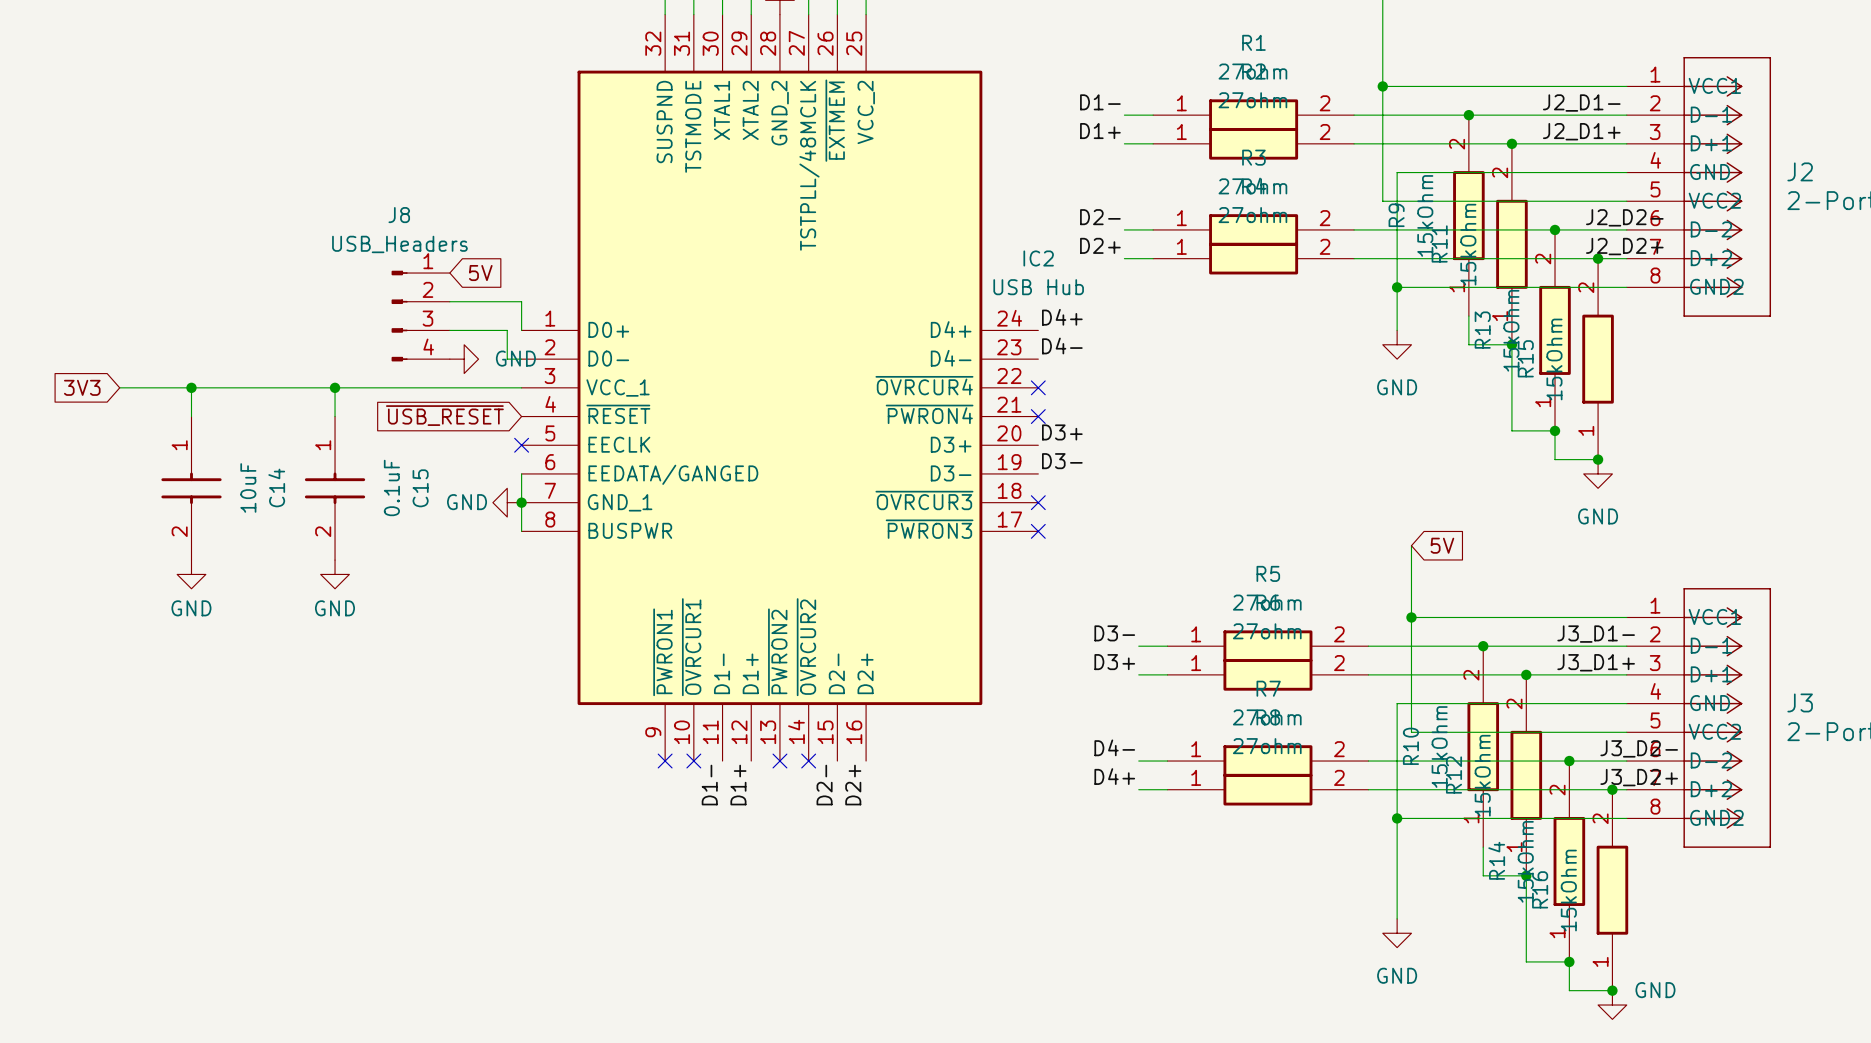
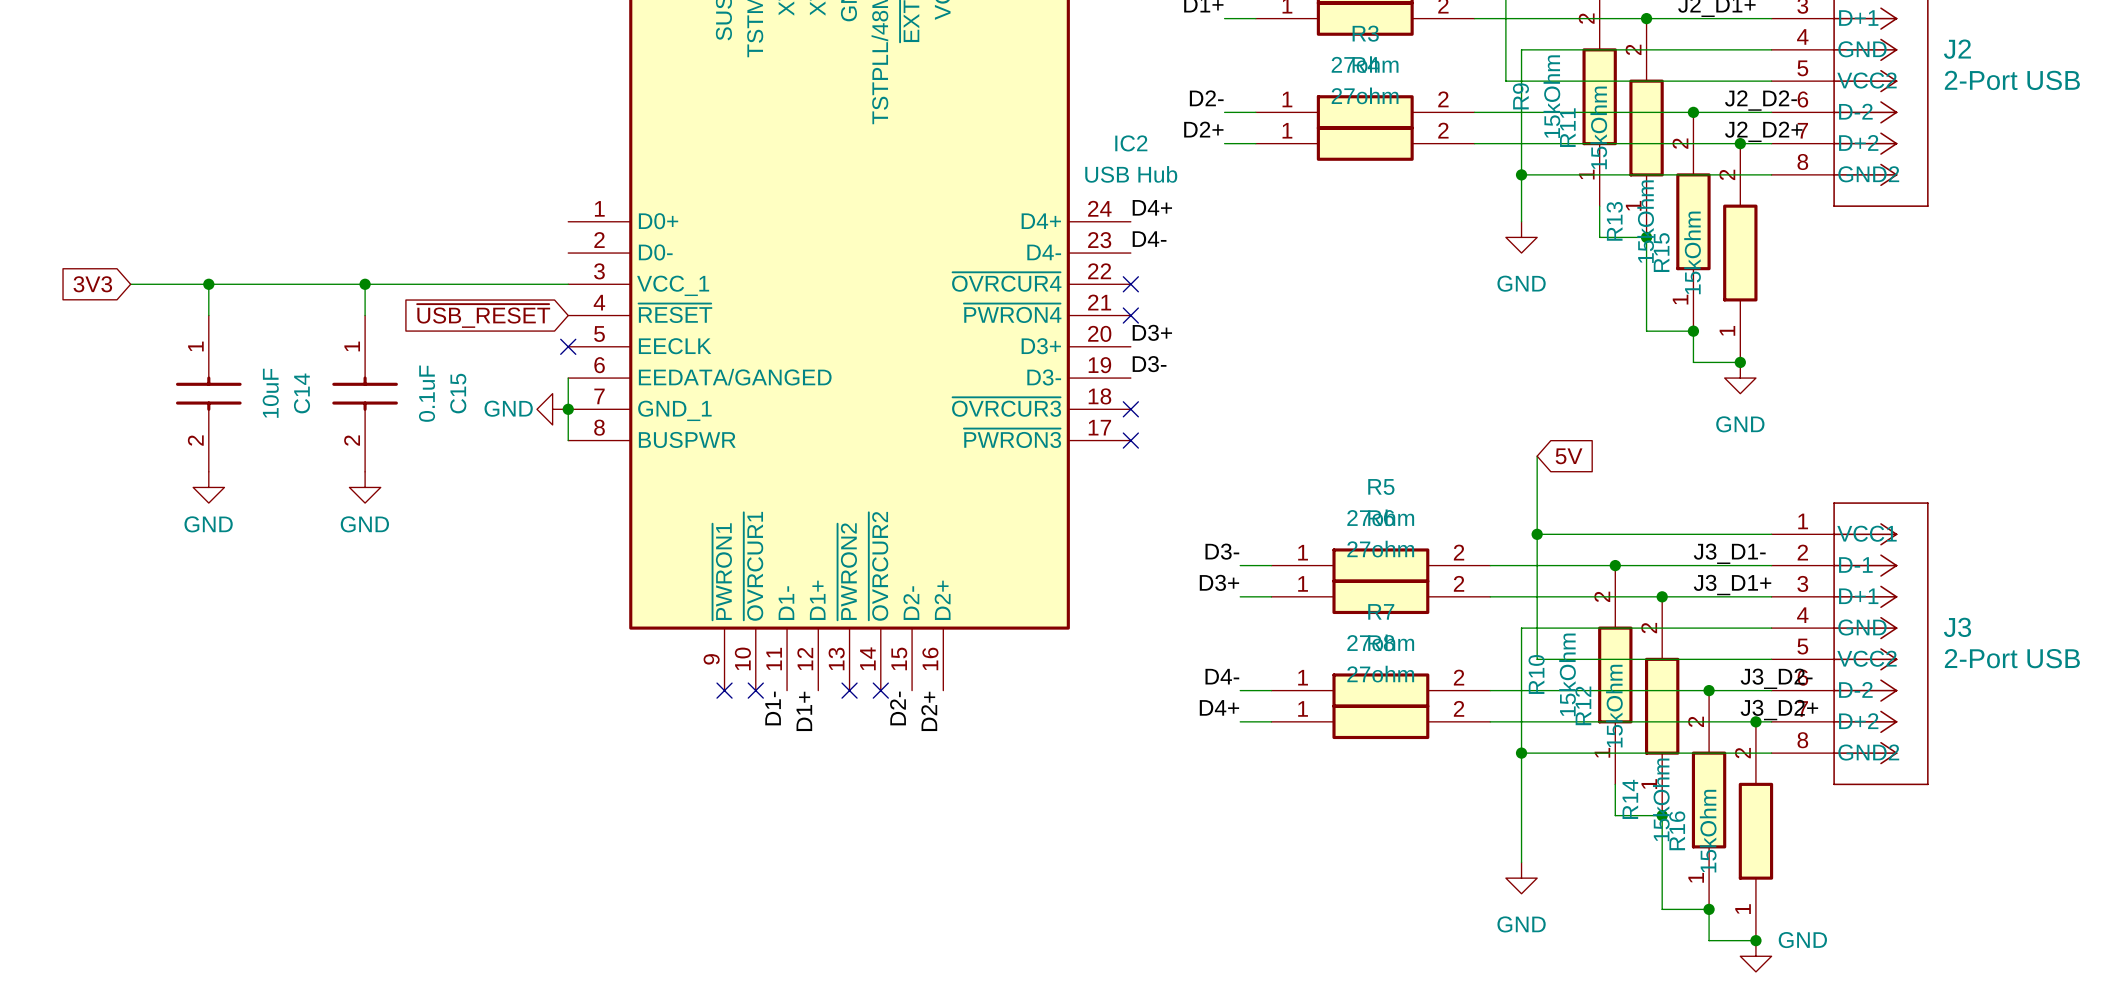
global label: 5V (480, 273) -> none
wire: (449, 301) (521, 301) (521, 330) -> none
J8: USB_Headers (420, 316) -> none
wire: (449, 330) (507, 330) (507, 359) (521, 359) -> none
power symbol: GND (464, 359) -> none

